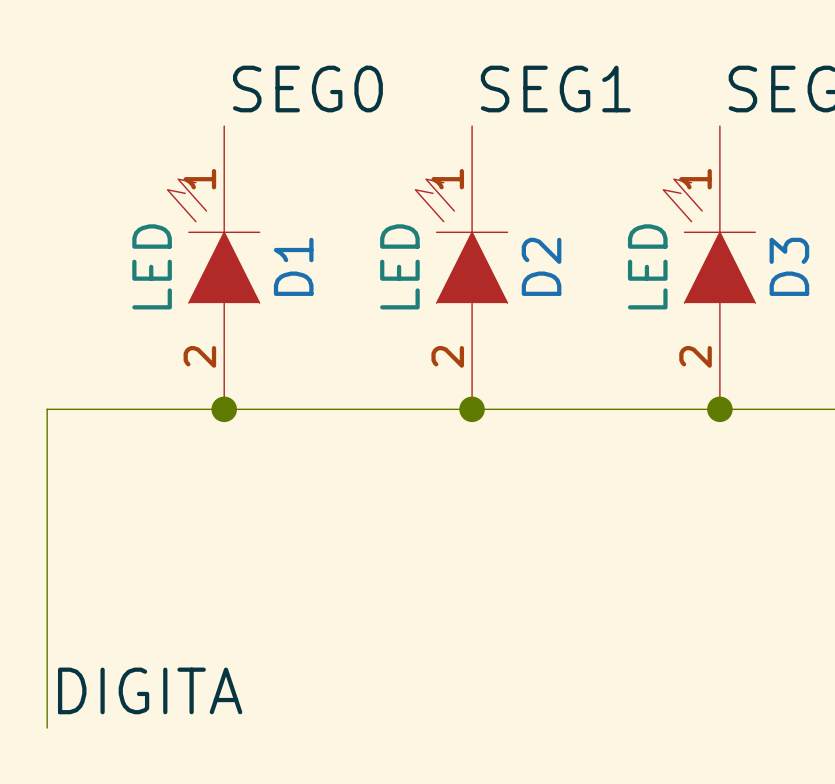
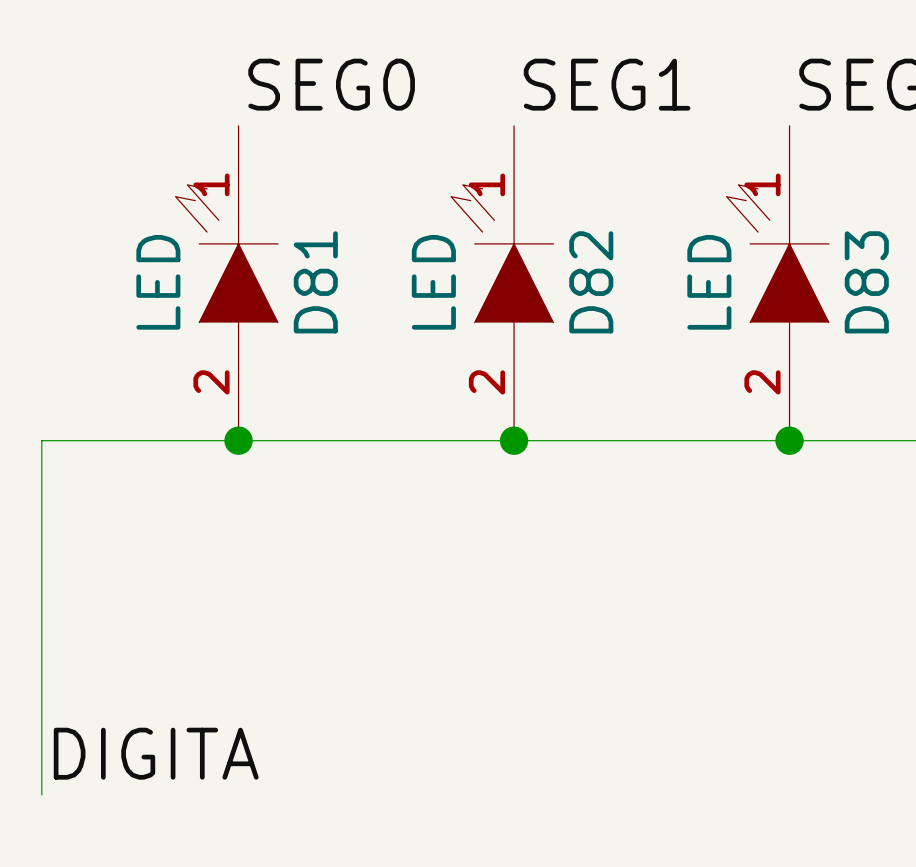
D1 name: D1 (293, 266) -> D81 (315, 282)
D2 name: D2 (541, 266) -> D82 (591, 282)
D3 name: D3 (789, 266) -> D83 (866, 282)

